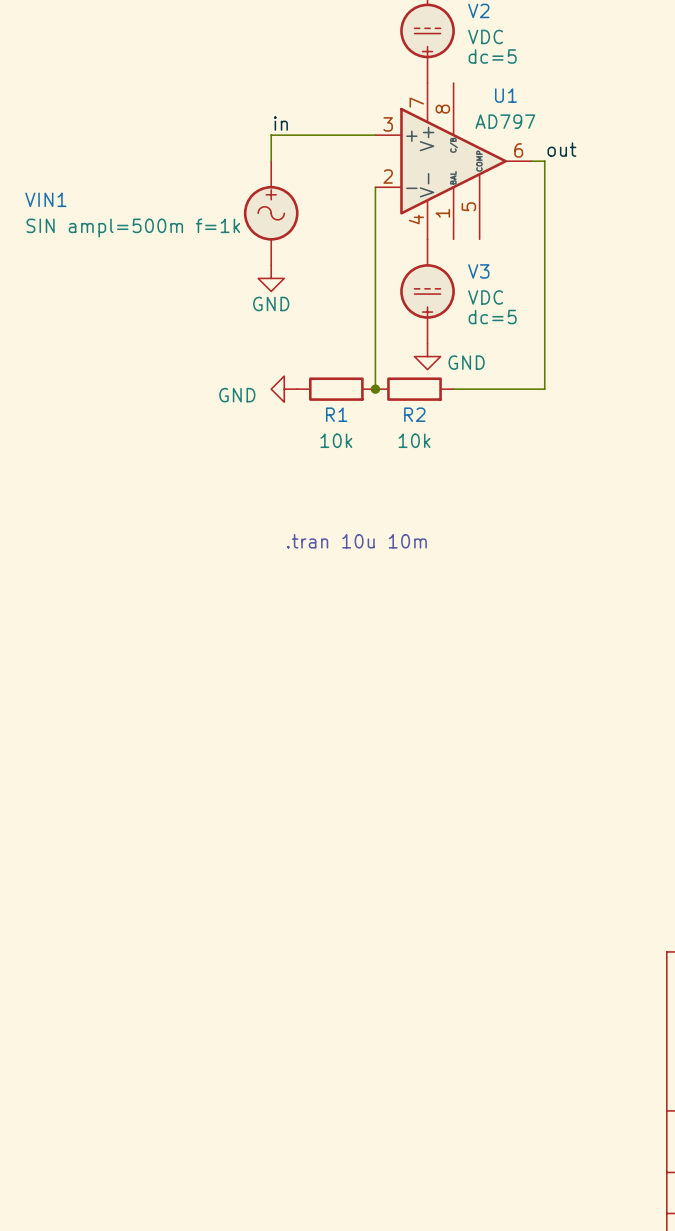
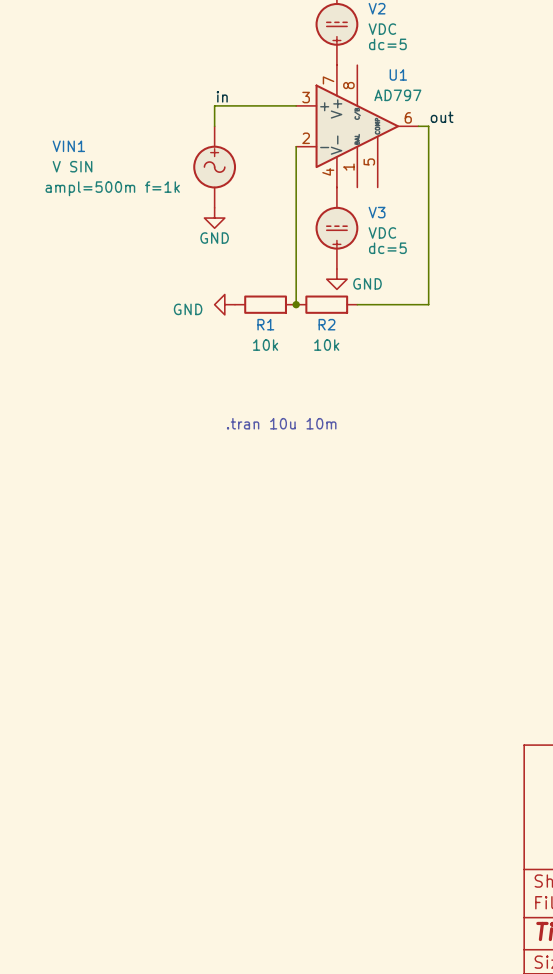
VIN1 name position: VIN1 (45, 199) -> VIN1 (68, 146)
VIN1 value: SIN ampl=500m f=1k (133, 228) -> V SIN (72, 166)
VIN1 text: none -> ampl=500m f=1k (112, 188)

